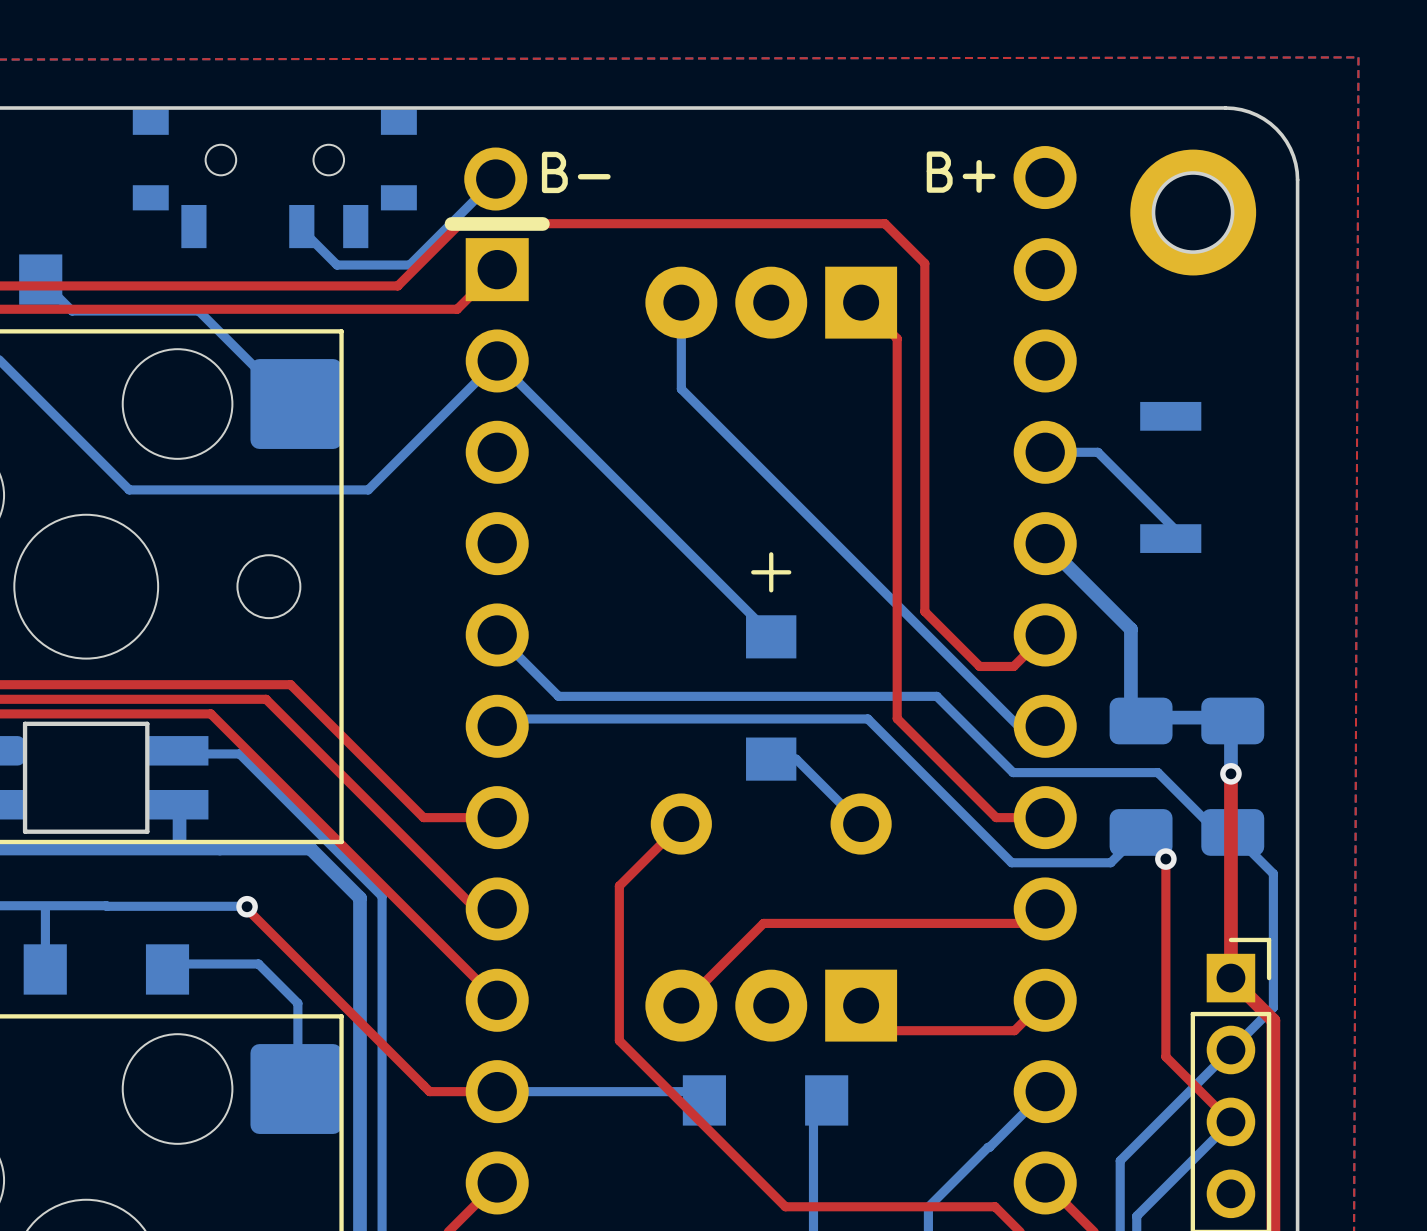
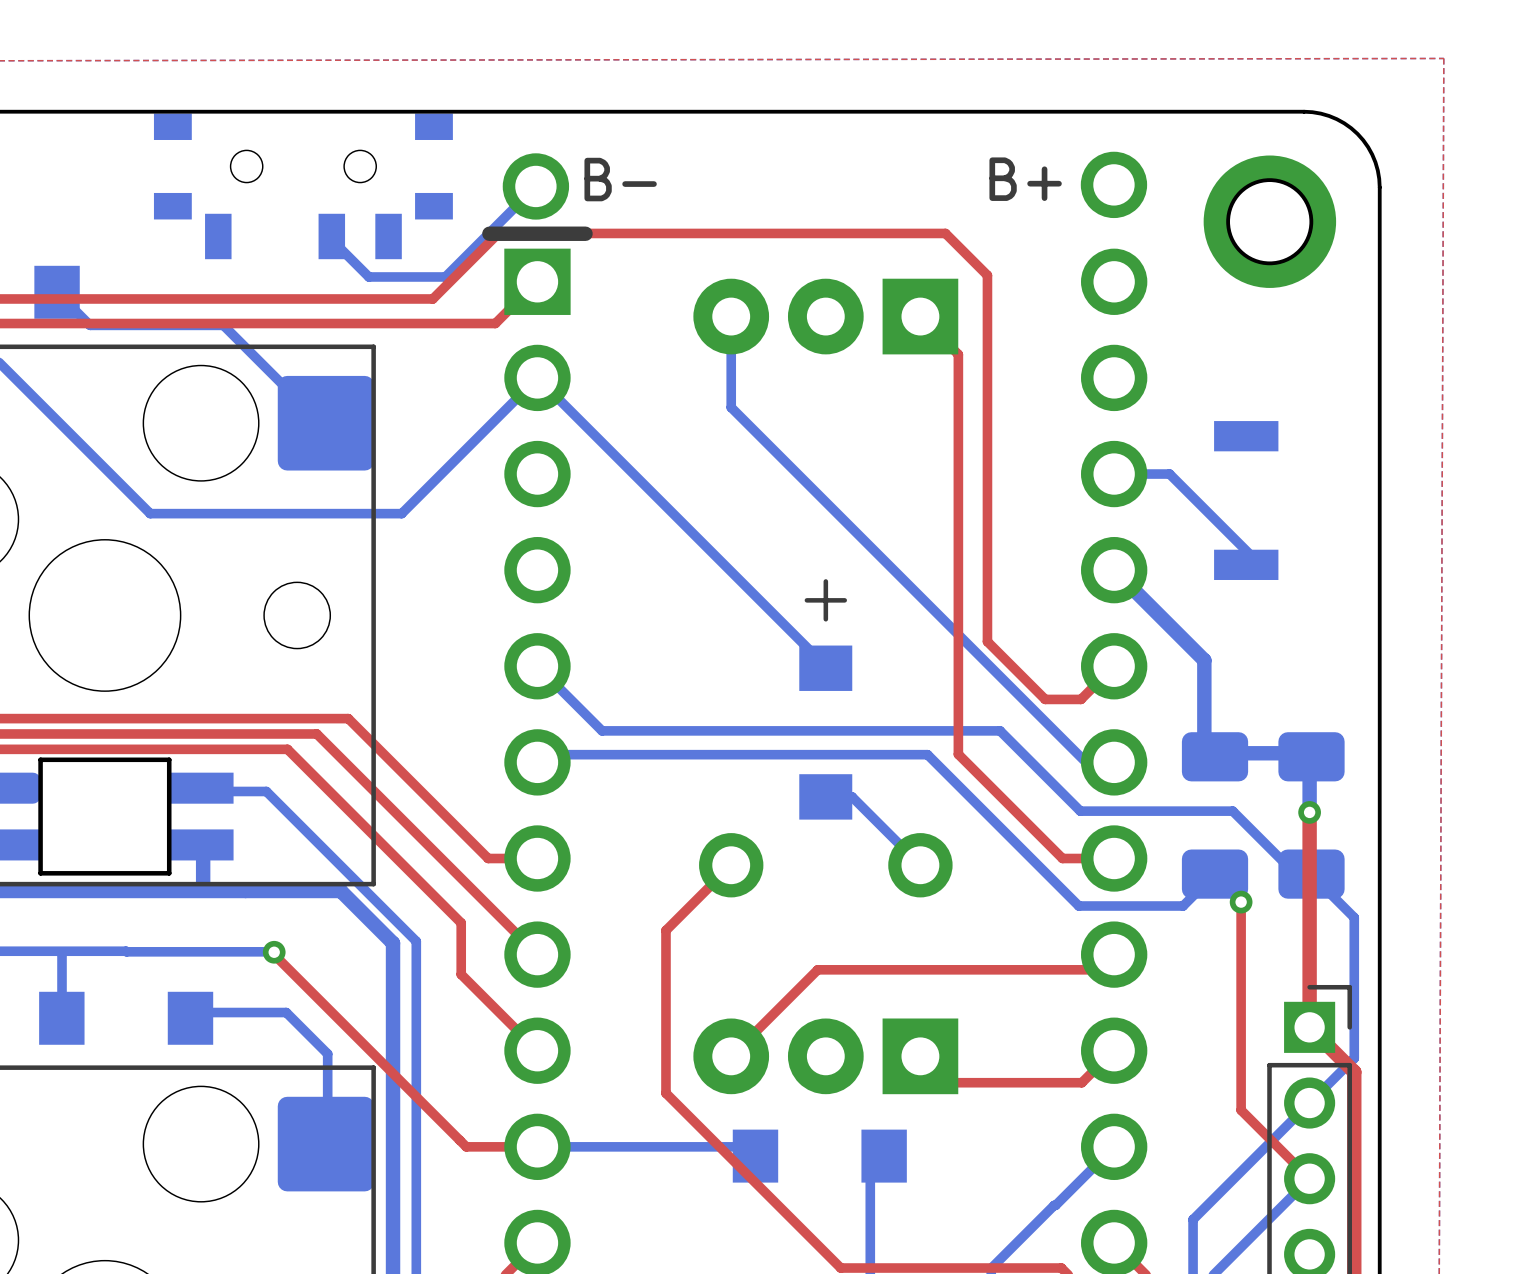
top track: (290, 684) (423, 817) (450, 817) -> (320, 718) (348, 718) (488, 858)
top track: (266, 699) (475, 908) (497, 908) -> (294, 733) (316, 733) (537, 954)
top track: (210, 713) (424, 927) -> (236, 749) (287, 749) (461, 922) (461, 974)

